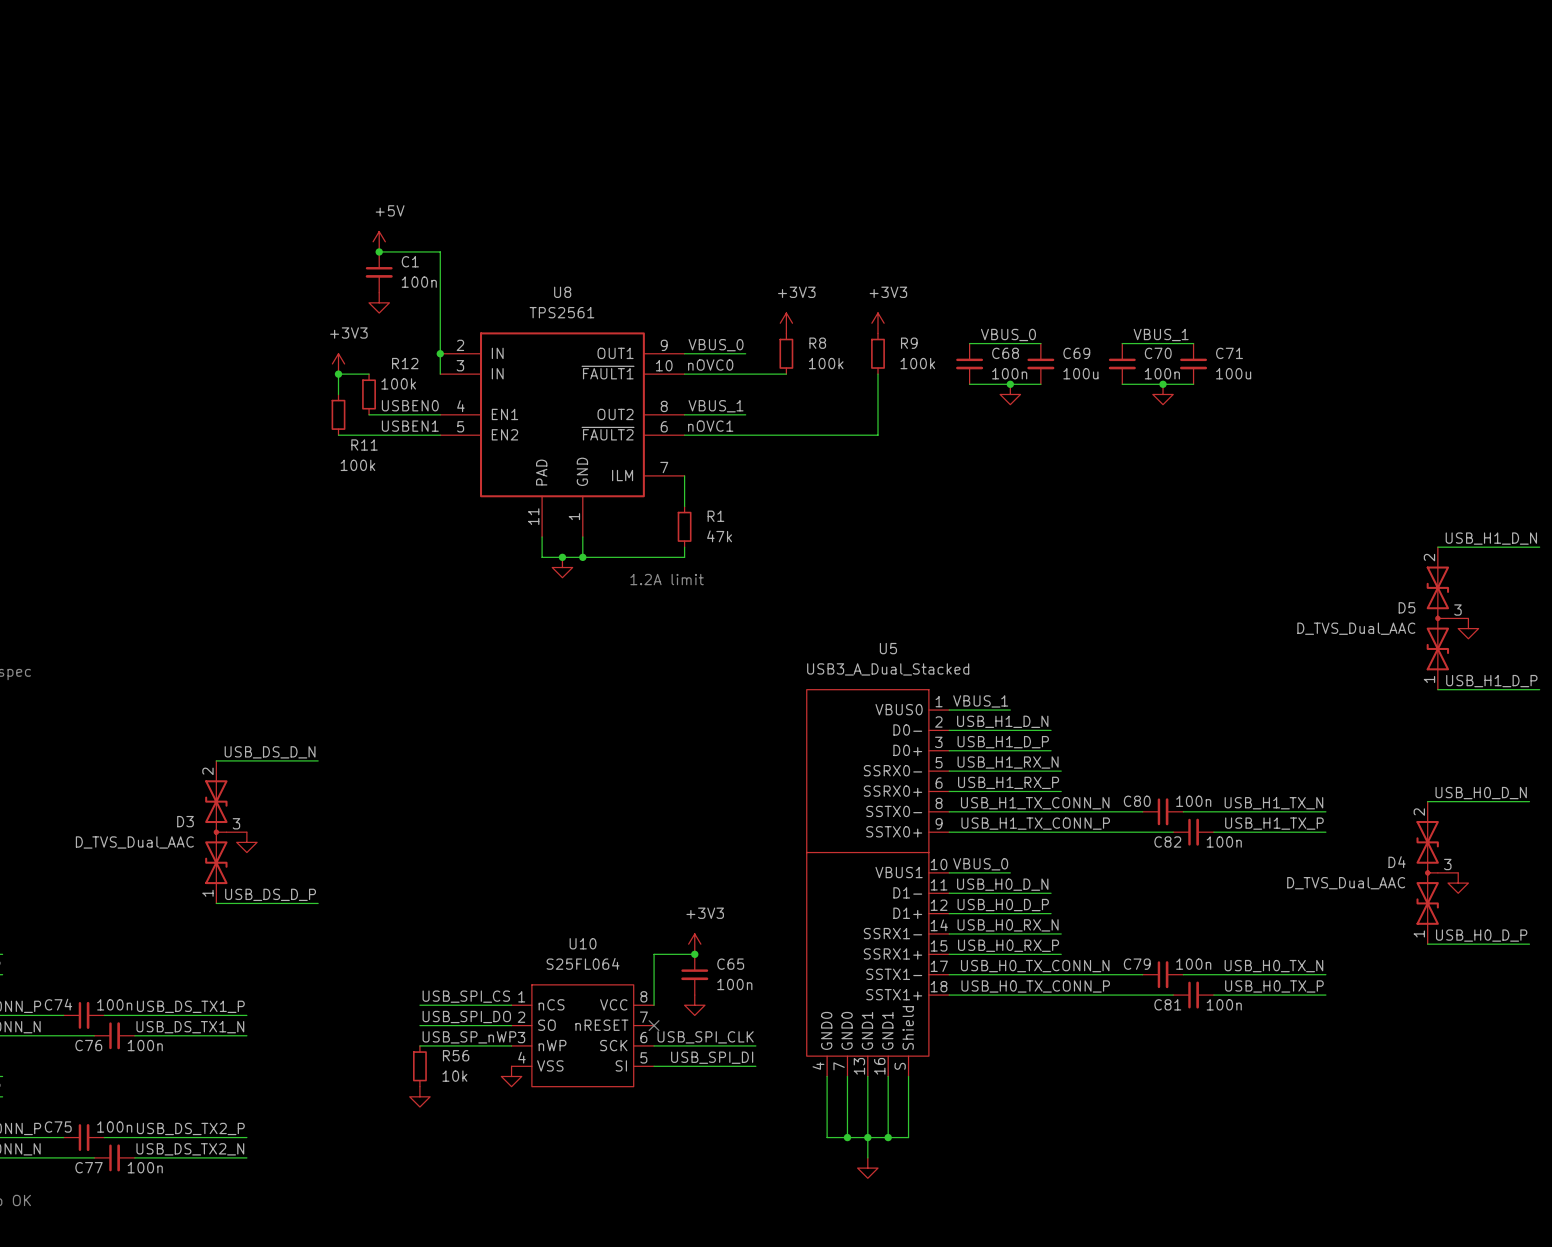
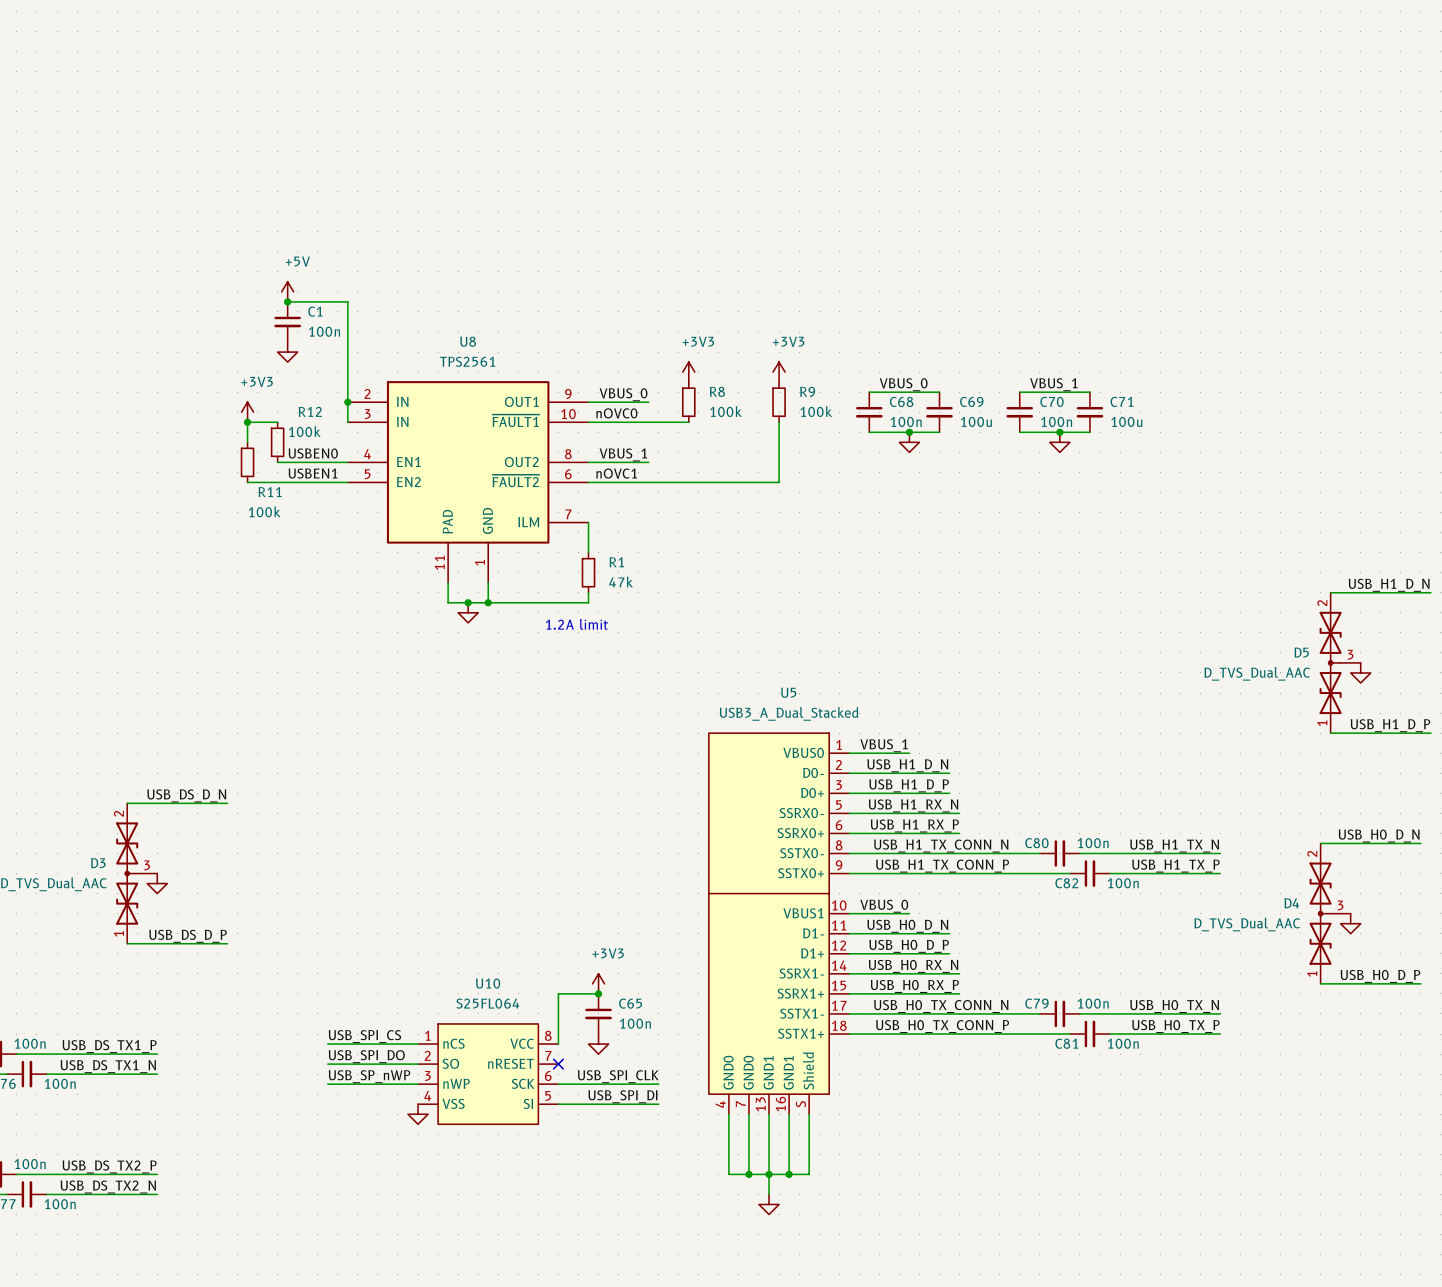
R56: 10k (419, 1066) -> none
power symbol: (419, 1096) -> none

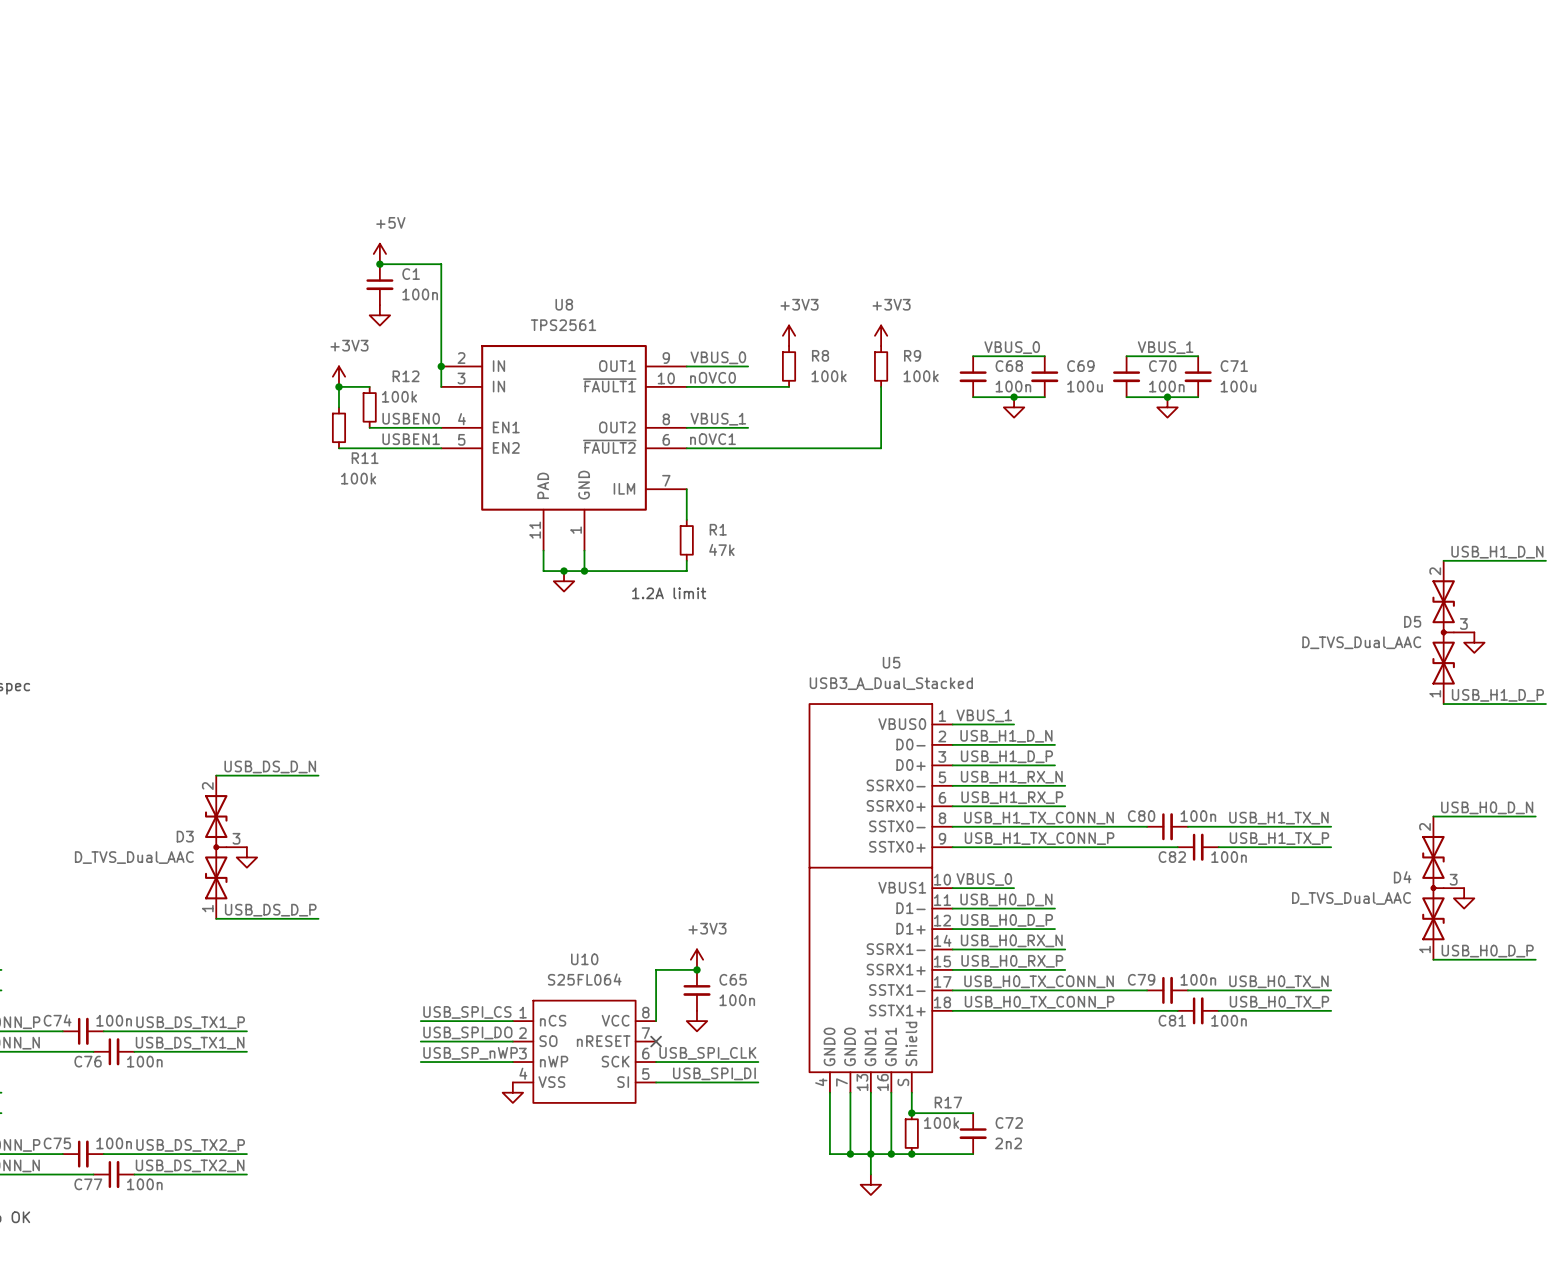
wire: (809, 1134) (809, 1174) -> (911, 1113) (973, 1113)
junction: none -> (911, 1113)
R17: none -> 100k (911, 1133)
C72: none -> 2n2 (973, 1133)
wire: none -> (911, 1154) (973, 1154)
junction: none -> (911, 1154)

